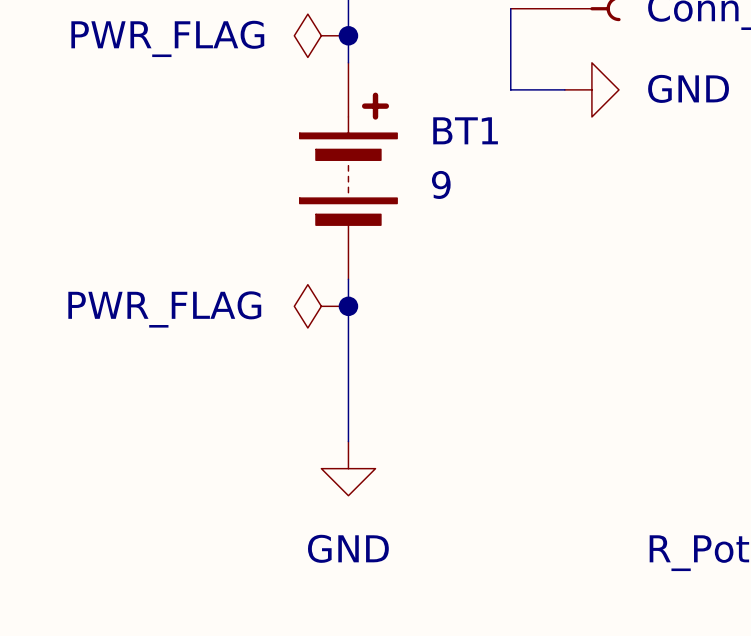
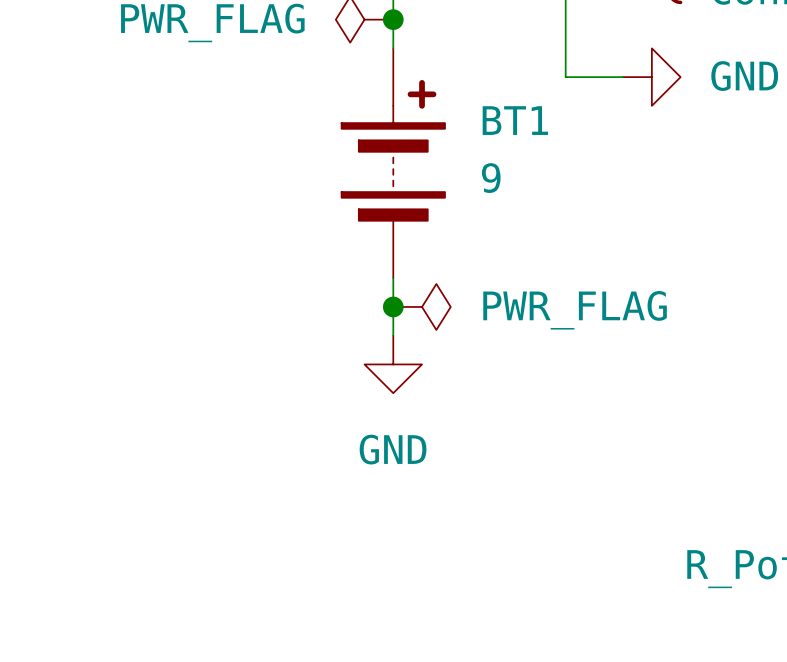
power symbol rotation: 0° (321, 306) -> 180° (422, 306)
power symbol position: PWR_FLAG (321, 306) -> PWR_FLAG (422, 306)
wire: (348, 333) (348, 441) -> none
power symbol position: GND (348, 468) -> GND (393, 364)

